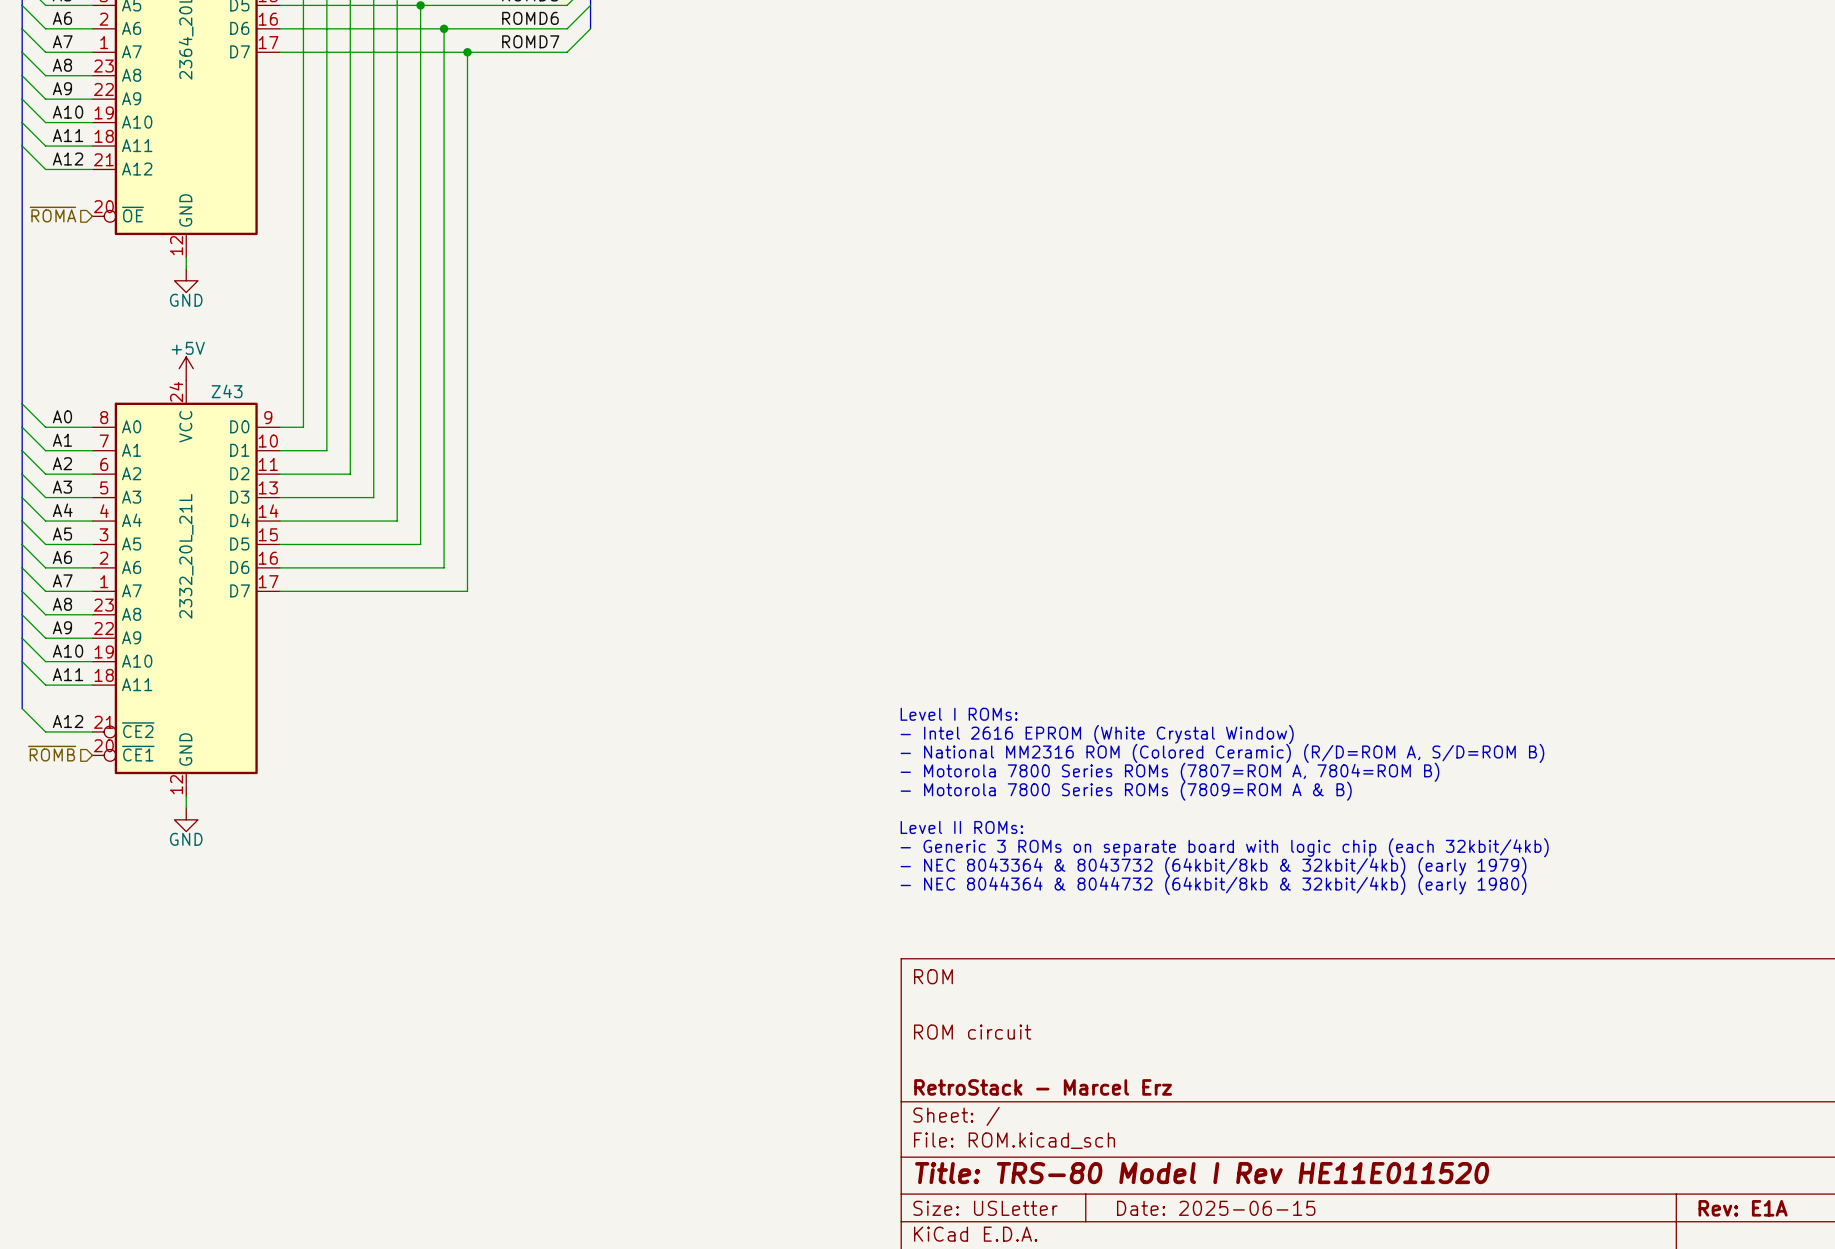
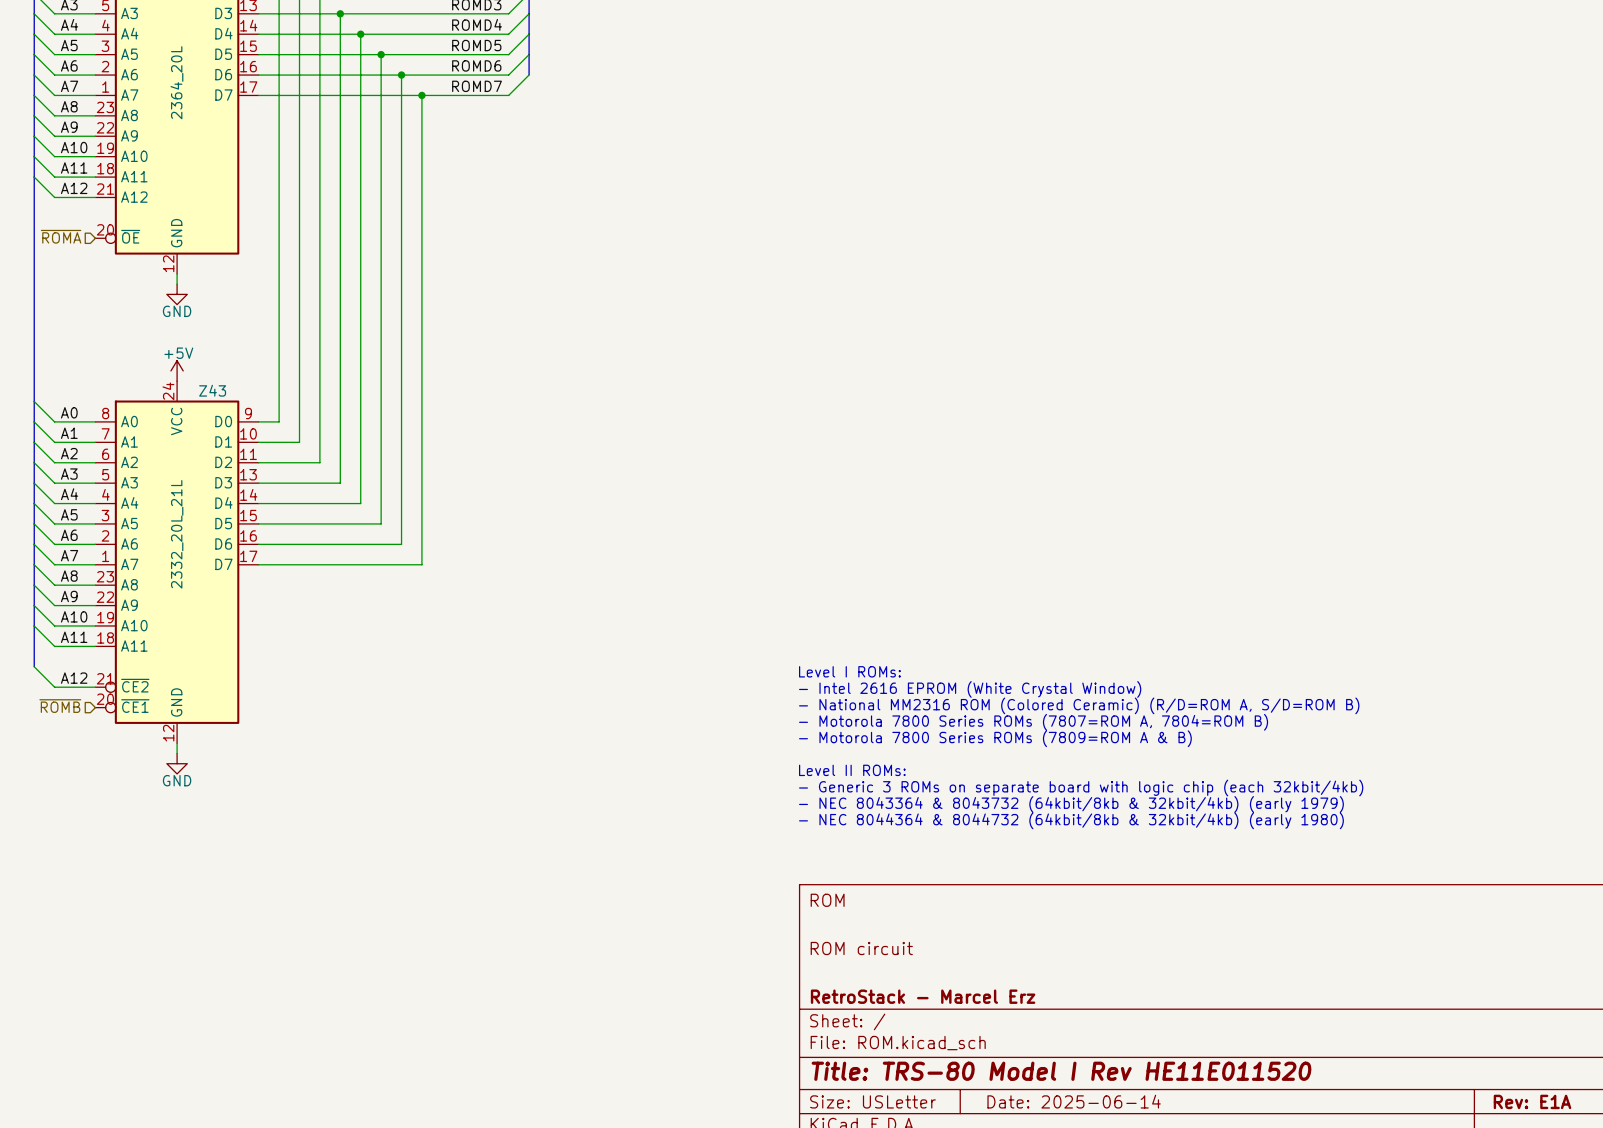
title block: Date: 2025-06-15 (1216, 1208) -> Date: 2025-06-14 (1074, 1101)

